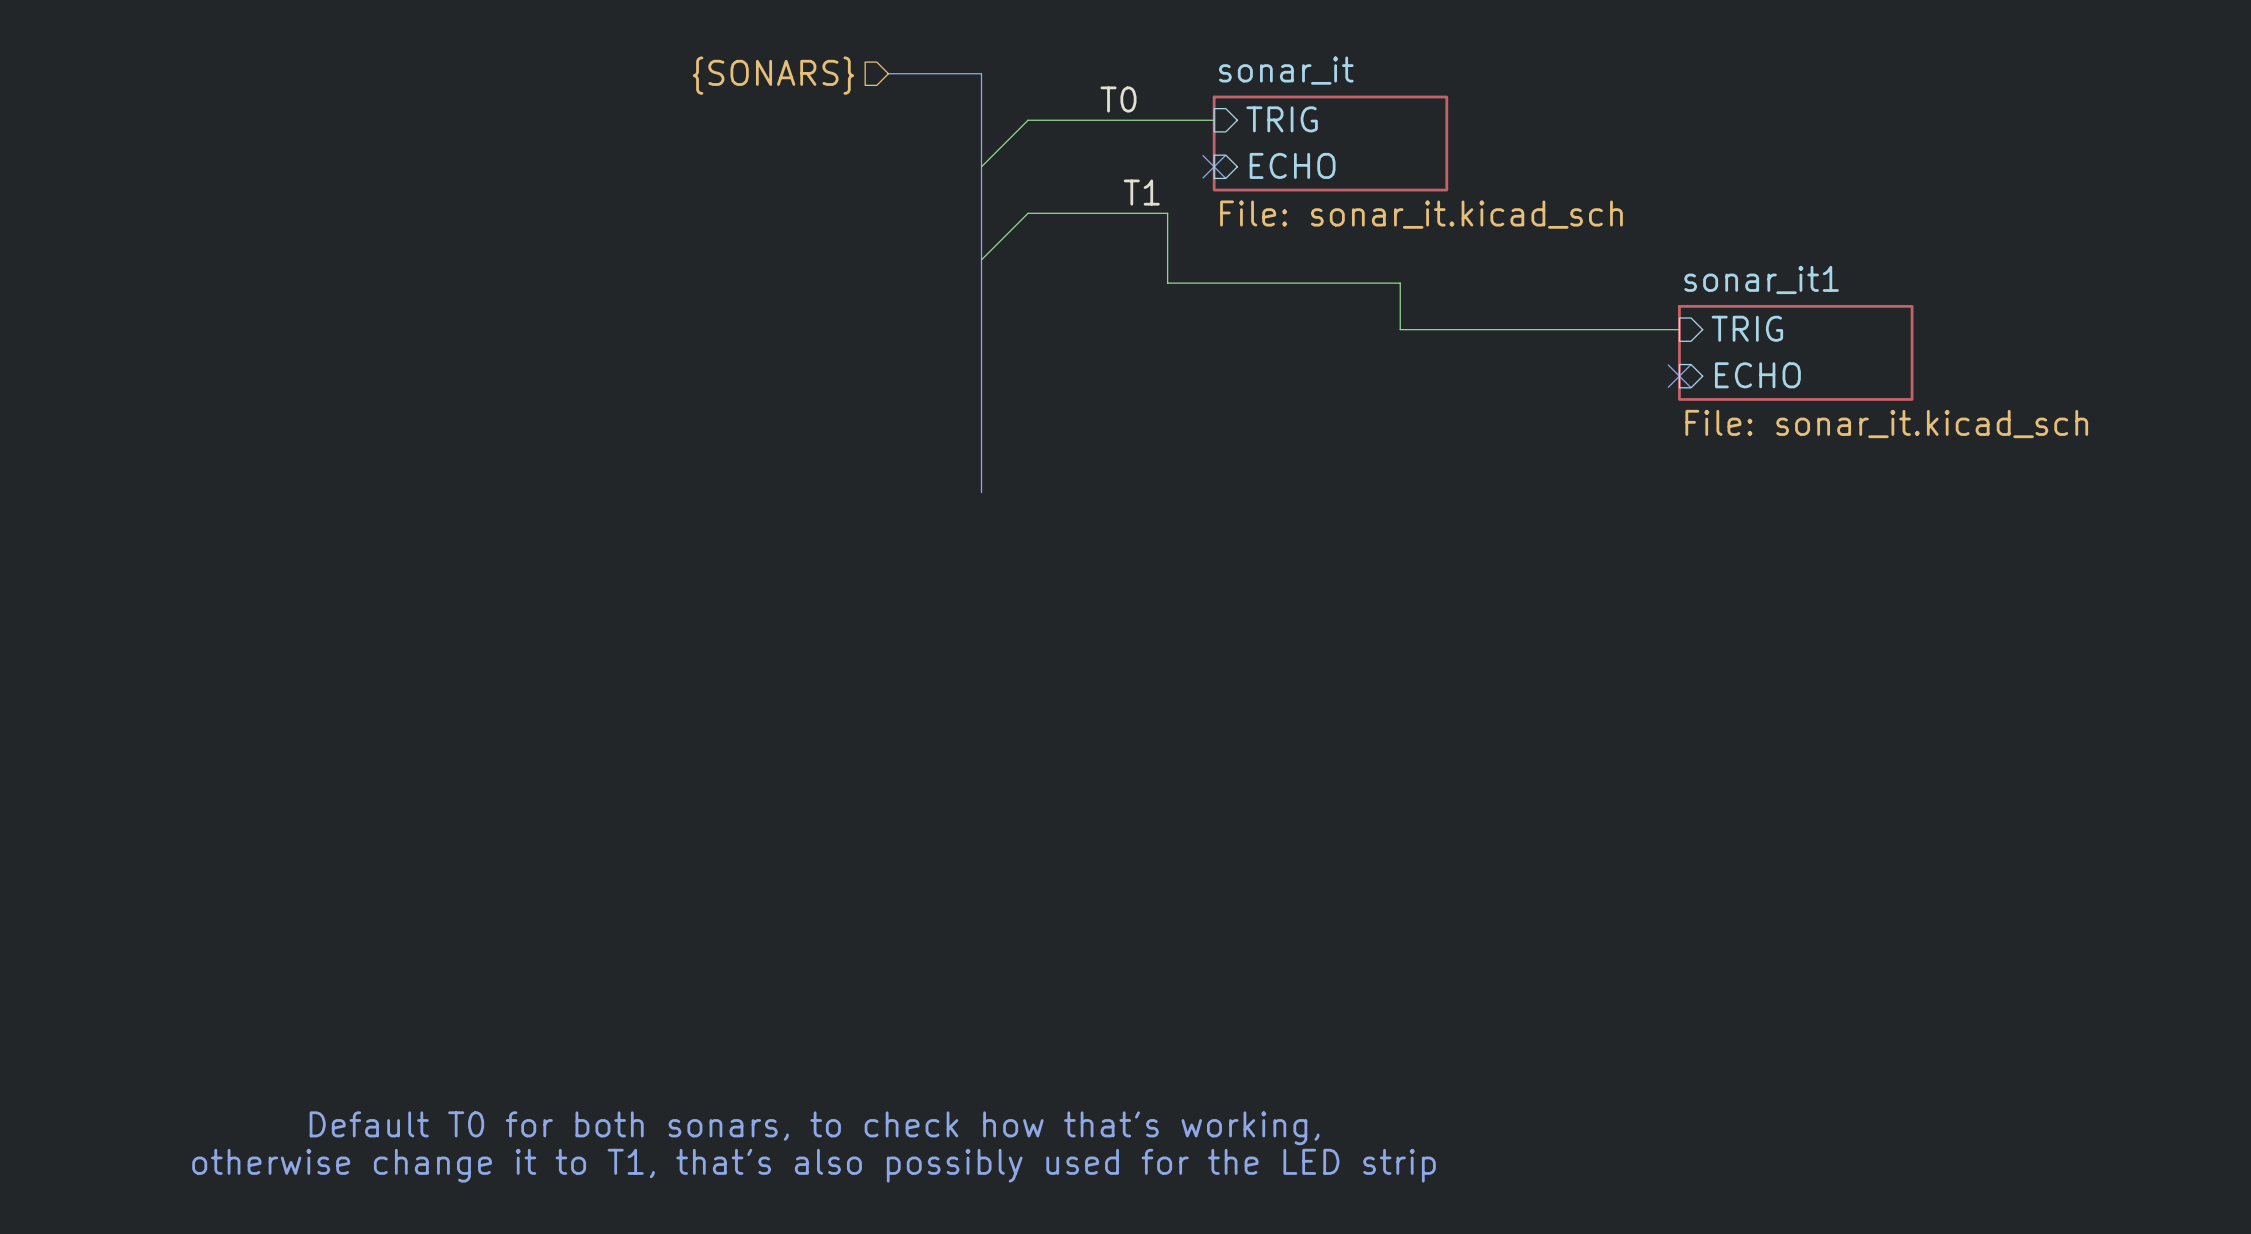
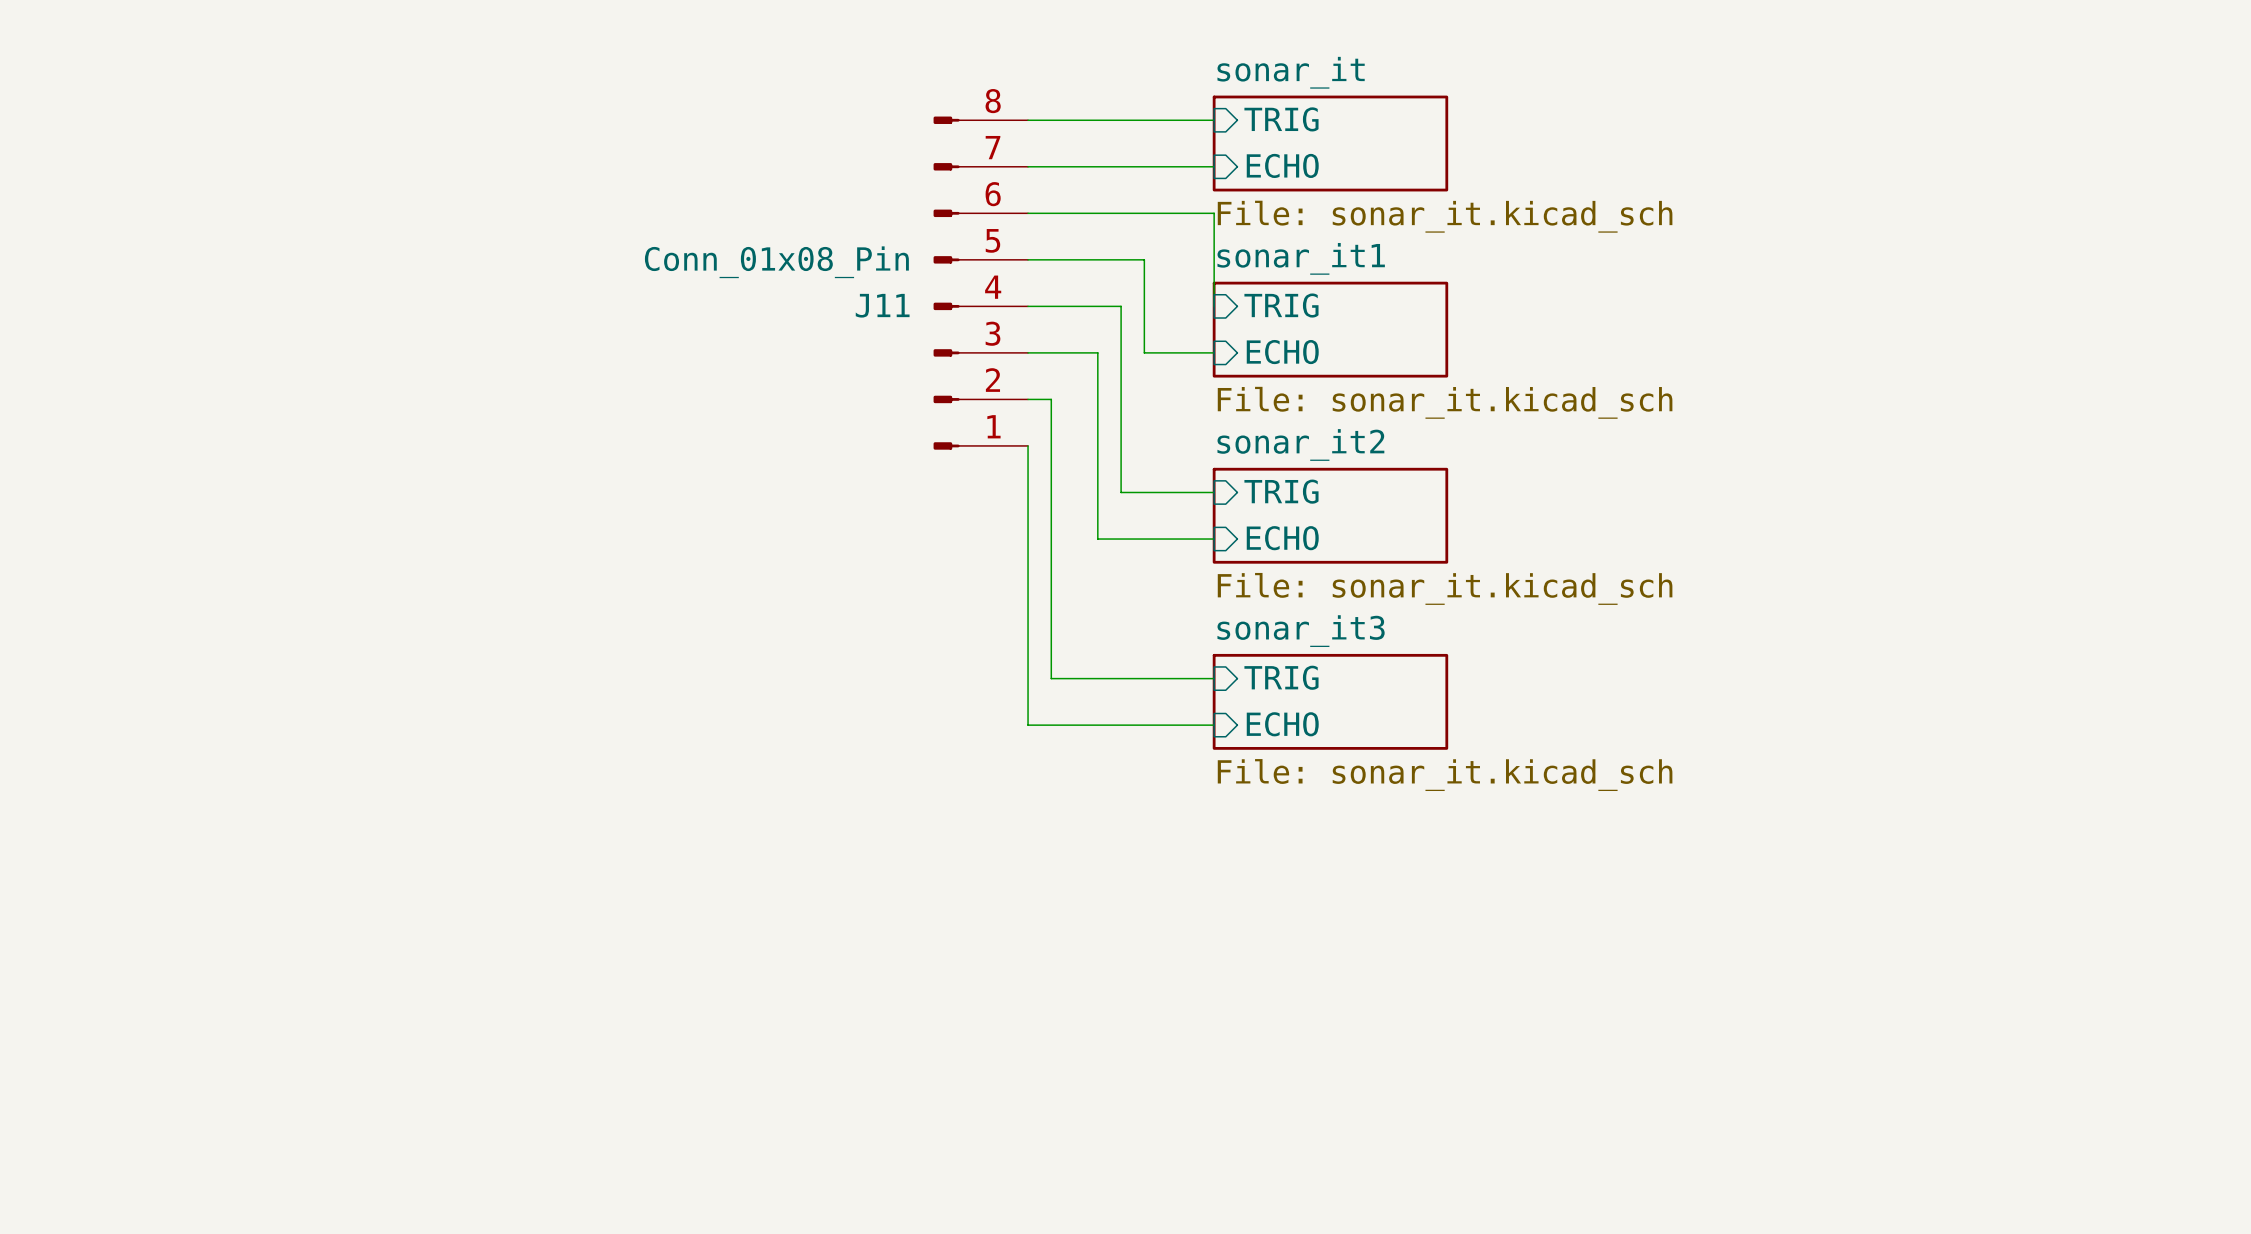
bus: (888, 73) (981, 73) (981, 492) -> none
hierarchical label: {SONARS} (773, 75) -> none
label: T0 (1118, 99) -> none
wire: (1028, 120) (981, 166) -> none
wire: none -> (1028, 166) (1214, 166)
no-connect mark: (1214, 166) -> none
label: T1 (1141, 192) -> none
wire: (1028, 213) (981, 259) -> none
wire: (1167, 213) (1167, 283) (1400, 283) (1400, 329) (1679, 329) -> (1167, 213) (1214, 213) (1214, 306)
wire: none -> (1028, 259) (1144, 259) (1144, 352) (1214, 352)
J11: none -> Conn_01x08_Pin (980, 283)
sheet pin: none -> TRIG (1281, 305)
wire: none -> (1028, 306) (1121, 306) (1121, 492) (1214, 492)
sheet pin: TRIG (1747, 328) -> none
wire: none -> (1028, 352) (1097, 352) (1097, 539) (1214, 539)
sheet pin: none -> ECHO (1282, 352)
sheet sonar_it1 position: (1795, 352) -> (1330, 329)
sheet pin: ECHO (1757, 375) -> none
no-connect mark: (1679, 376) -> none
wire: none -> (1028, 399) (1051, 399) (1051, 678) (1214, 678)
wire: none -> (1028, 445) (1028, 725) (1214, 725)
sheet pin: none -> TRIG (1281, 491)
sheet sonar_it2: none -> File: sonar_it.kicad_sch (1330, 515)
sheet pin: none -> ECHO (1282, 538)
sheet pin: none -> TRIG (1281, 677)
sheet sonar_it3: none -> File: sonar_it.kicad_sch (1330, 701)
sheet pin: none -> ECHO (1282, 724)
text: Default T0 for both sonars, to check how that's working, (814, 1128) -> none
text: otherwise change it to T1, that's also possibly used for the LED strip (813, 1165) -> none

